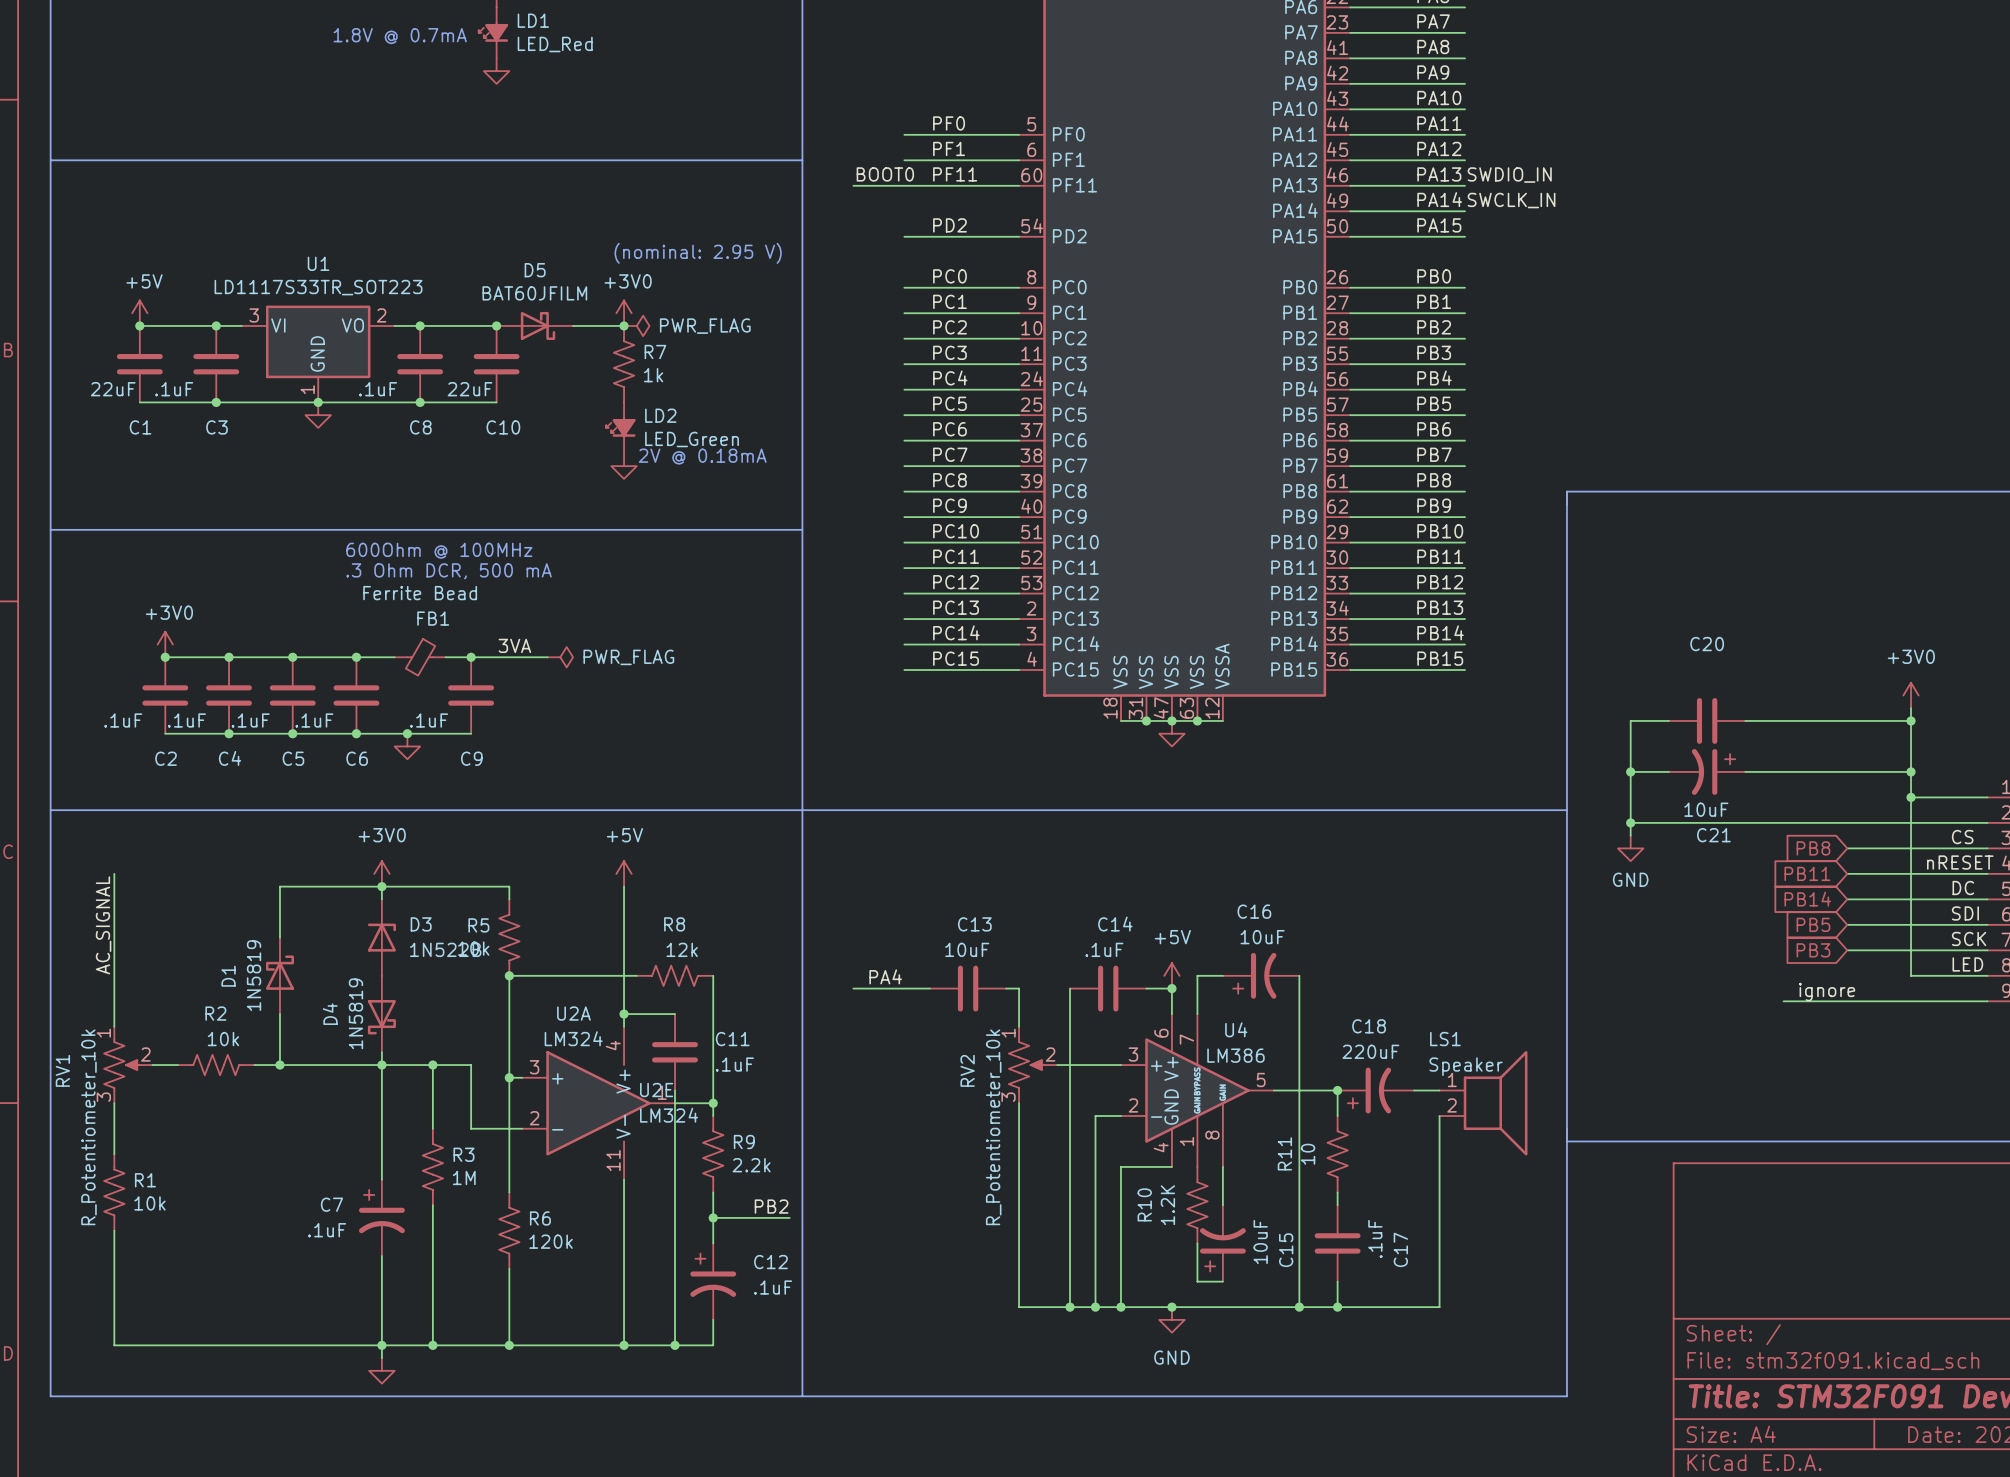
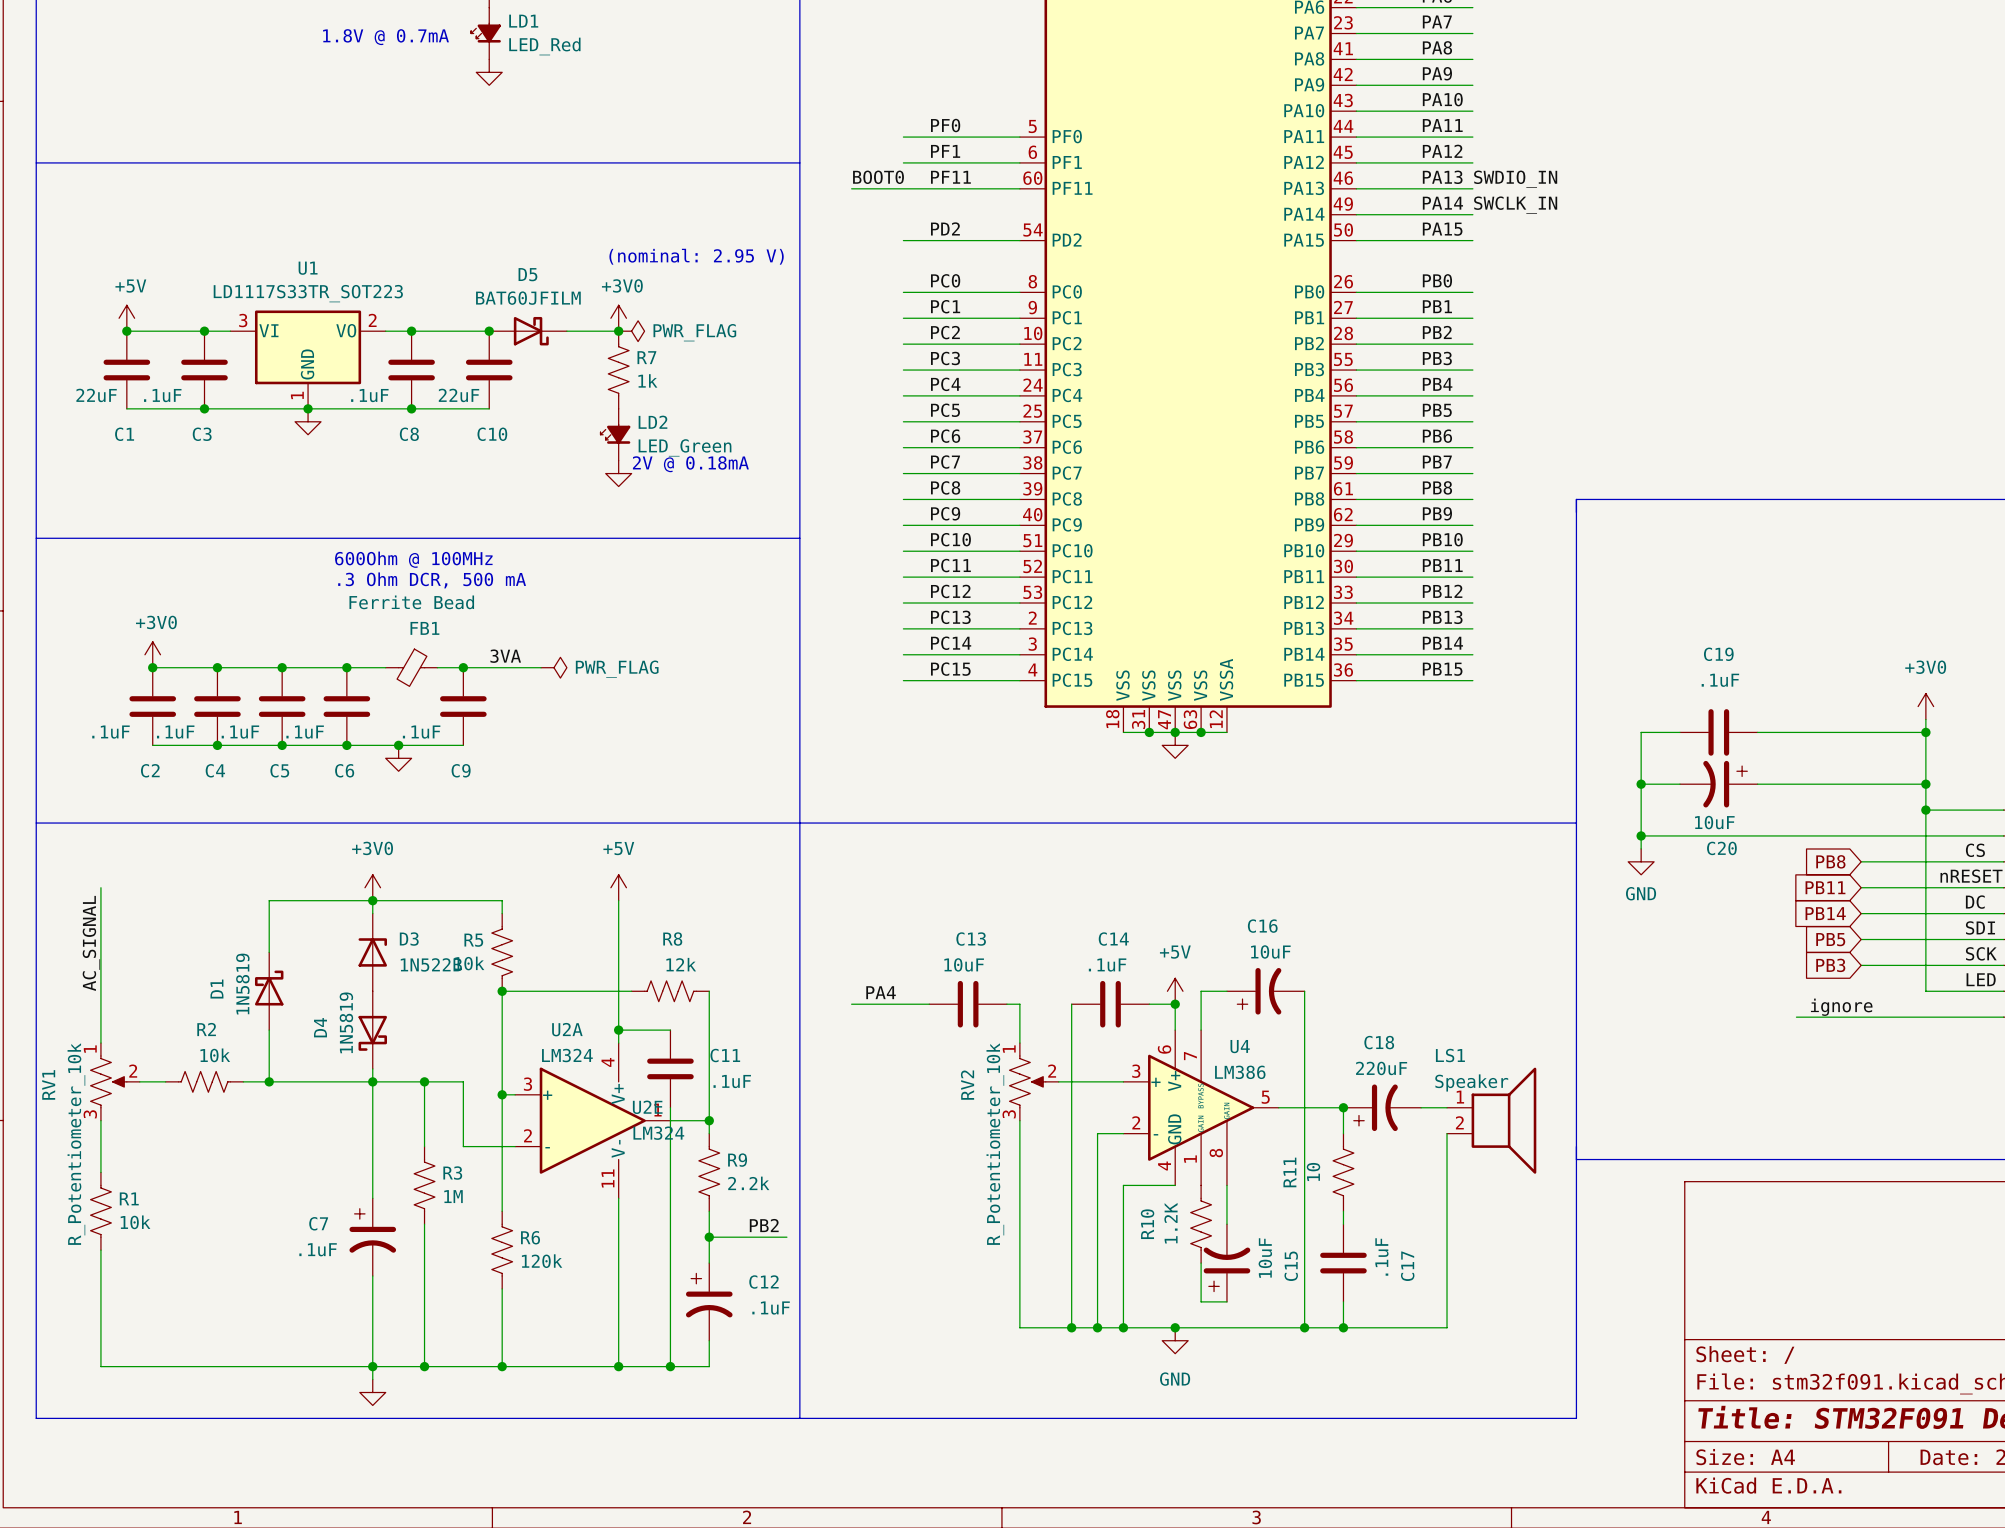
C20 name: C20 (1707, 644) -> C19 (1718, 654)
C20 value: none -> .1uF (1720, 680)
C21 name: C21 (1713, 835) -> C20 (1721, 848)

